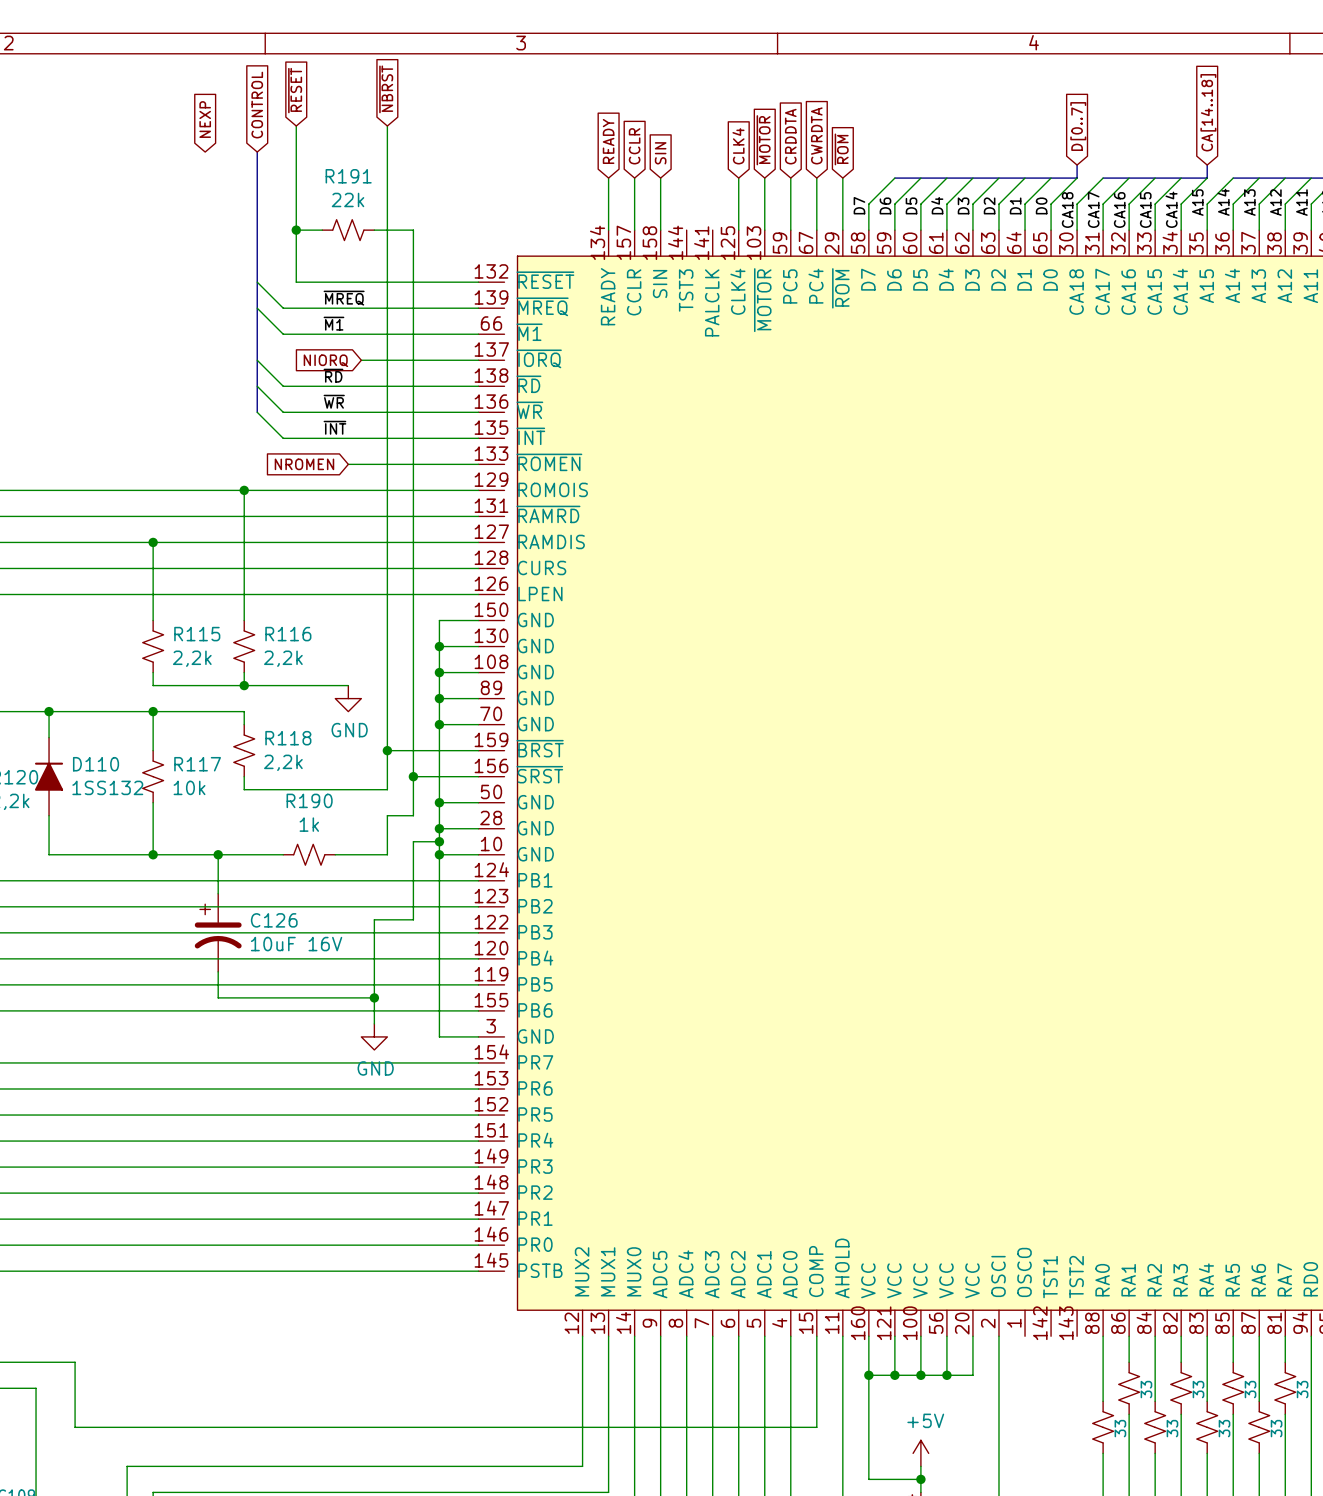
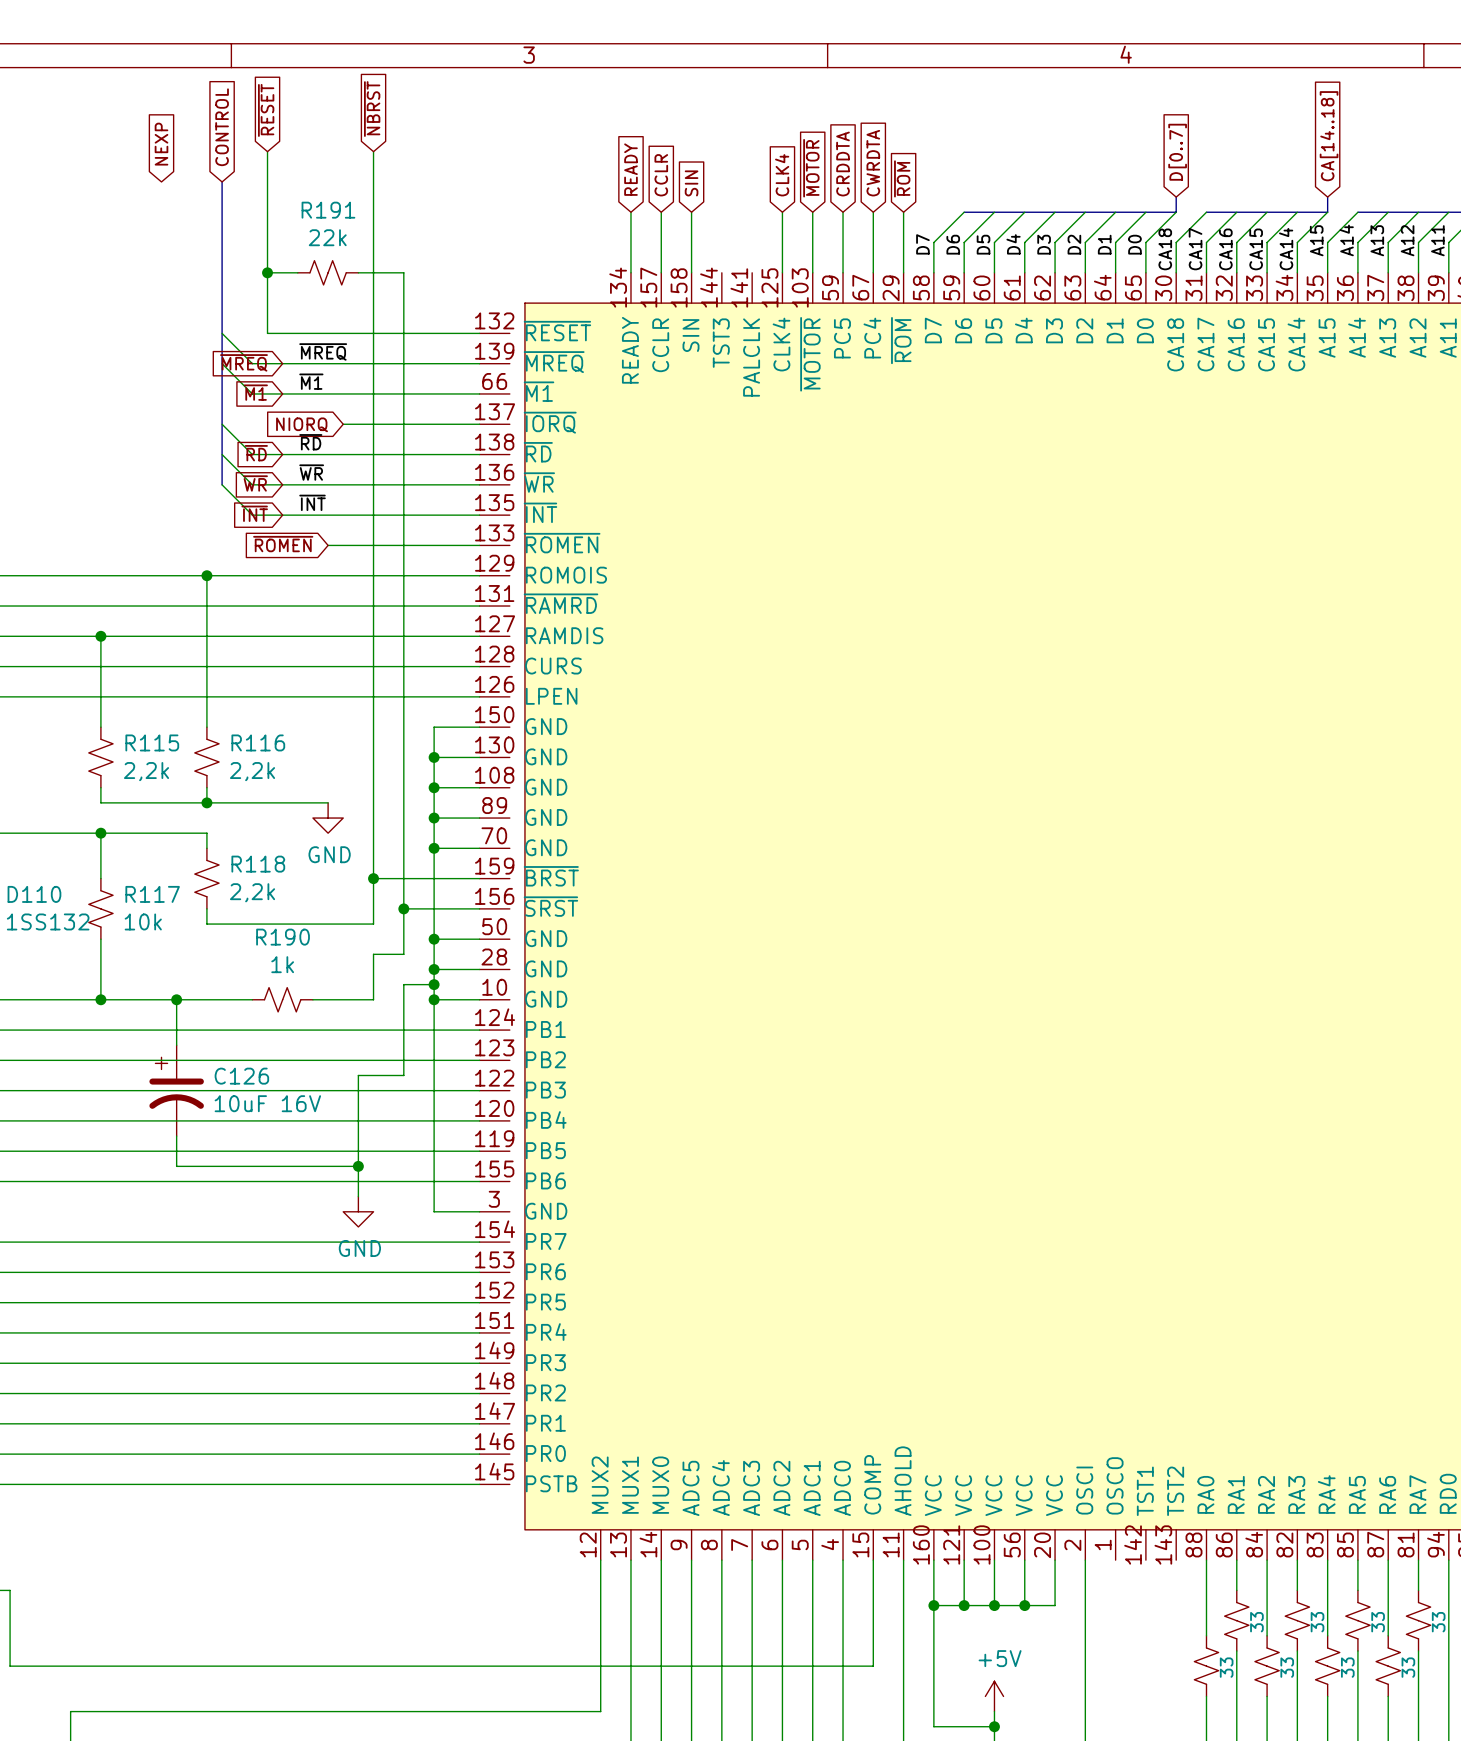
global label: none -> ~{MREQ} (243, 362)
global label: none -> ~{M1} (255, 392)
global label: none -> ~{RD} (256, 453)
global label: none -> ~{WR} (255, 483)
global label: none -> ~{INT} (254, 513)
global label: NROMEN (304, 464) -> ~{ROMEN} (283, 544)

